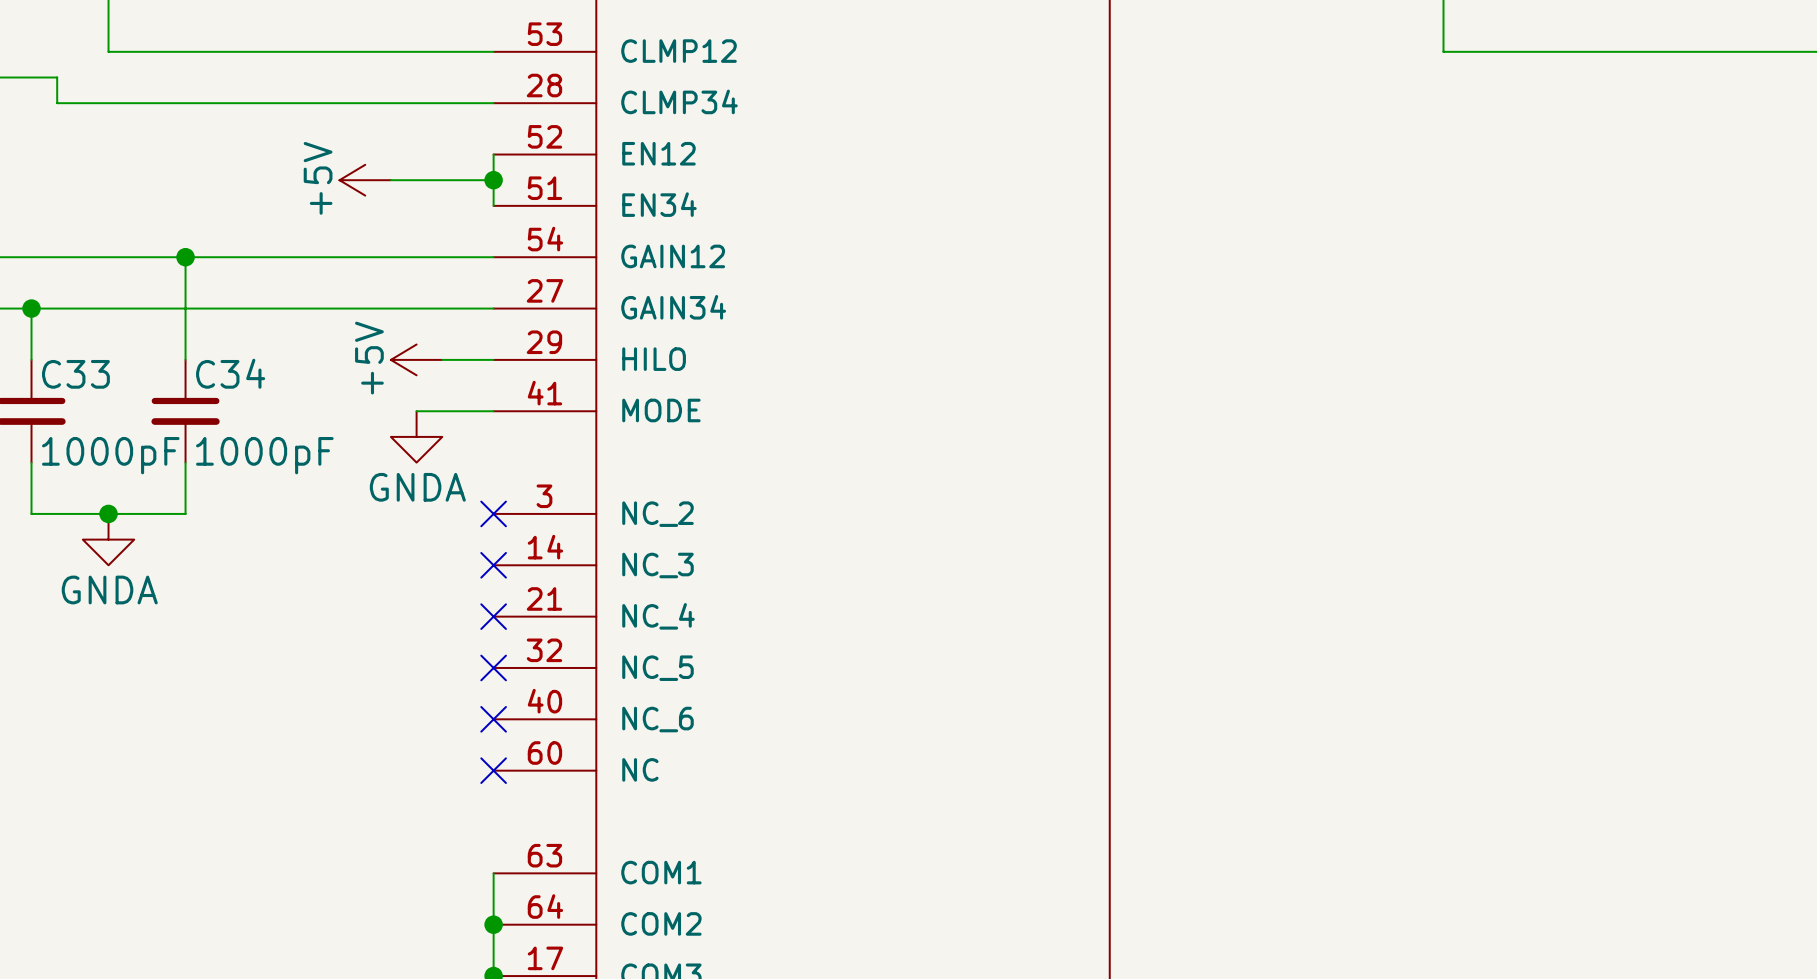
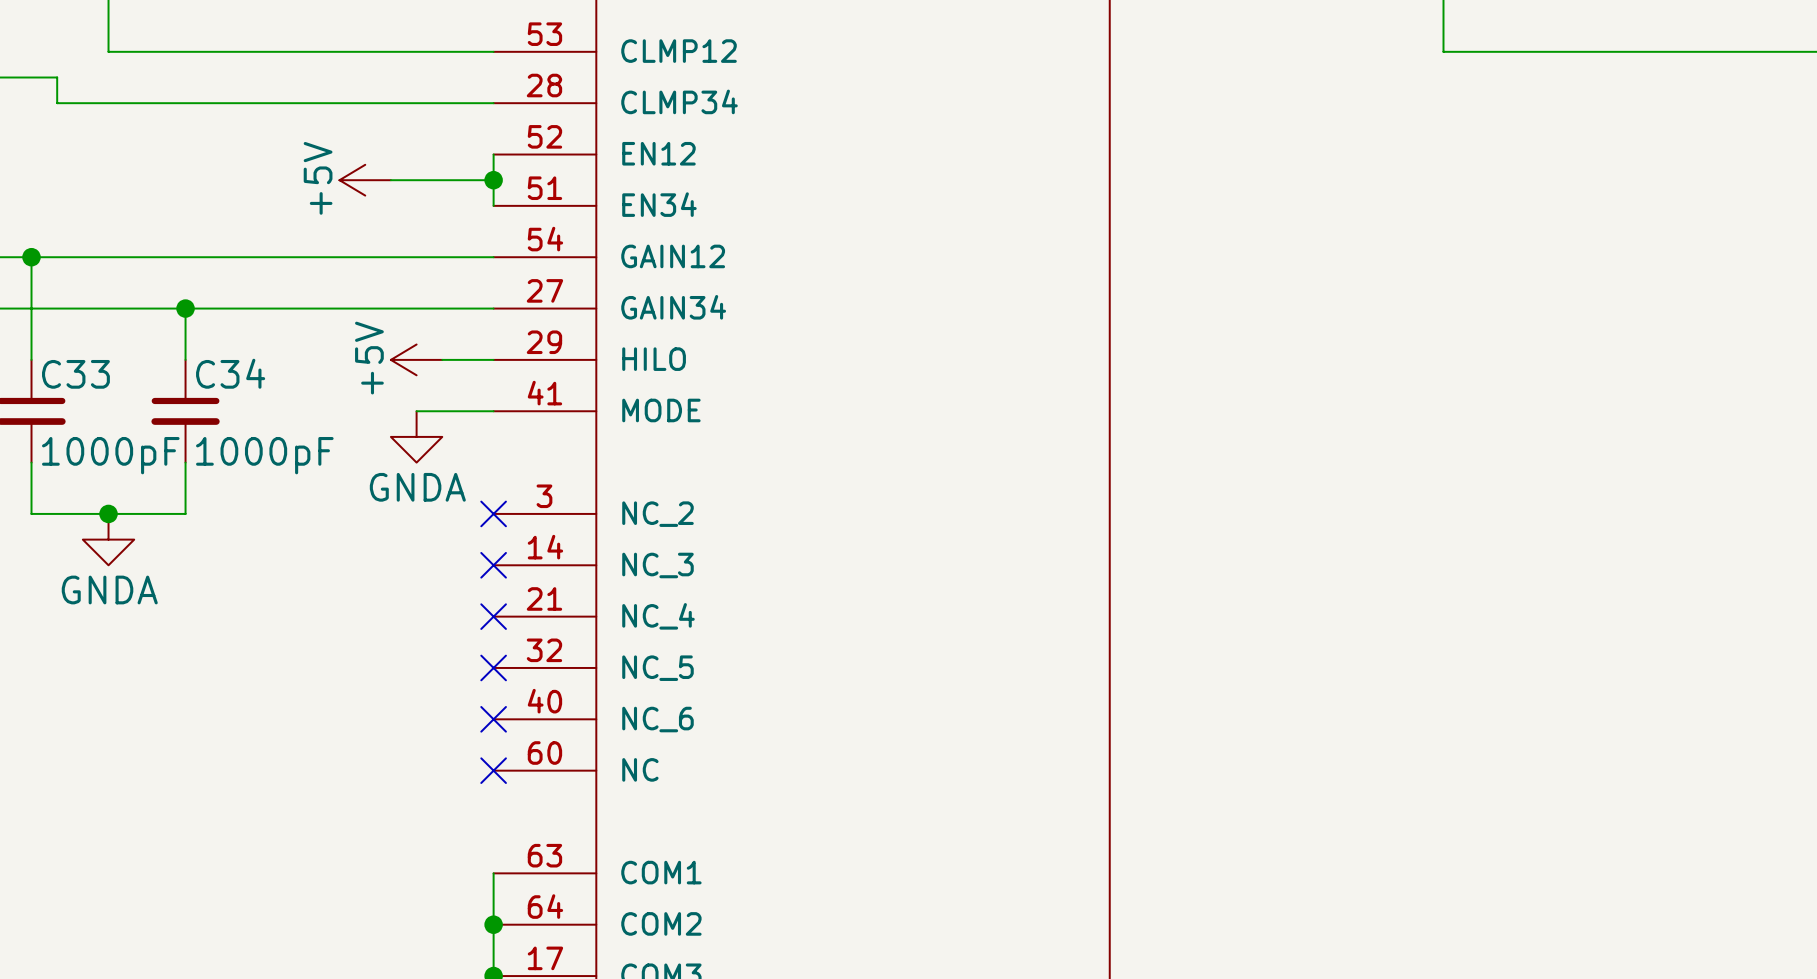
wire: (185, 257) (185, 308) -> (31, 257) (31, 308)
junction position: (185, 257) -> (185, 308)
junction position: (31, 308) -> (31, 257)

